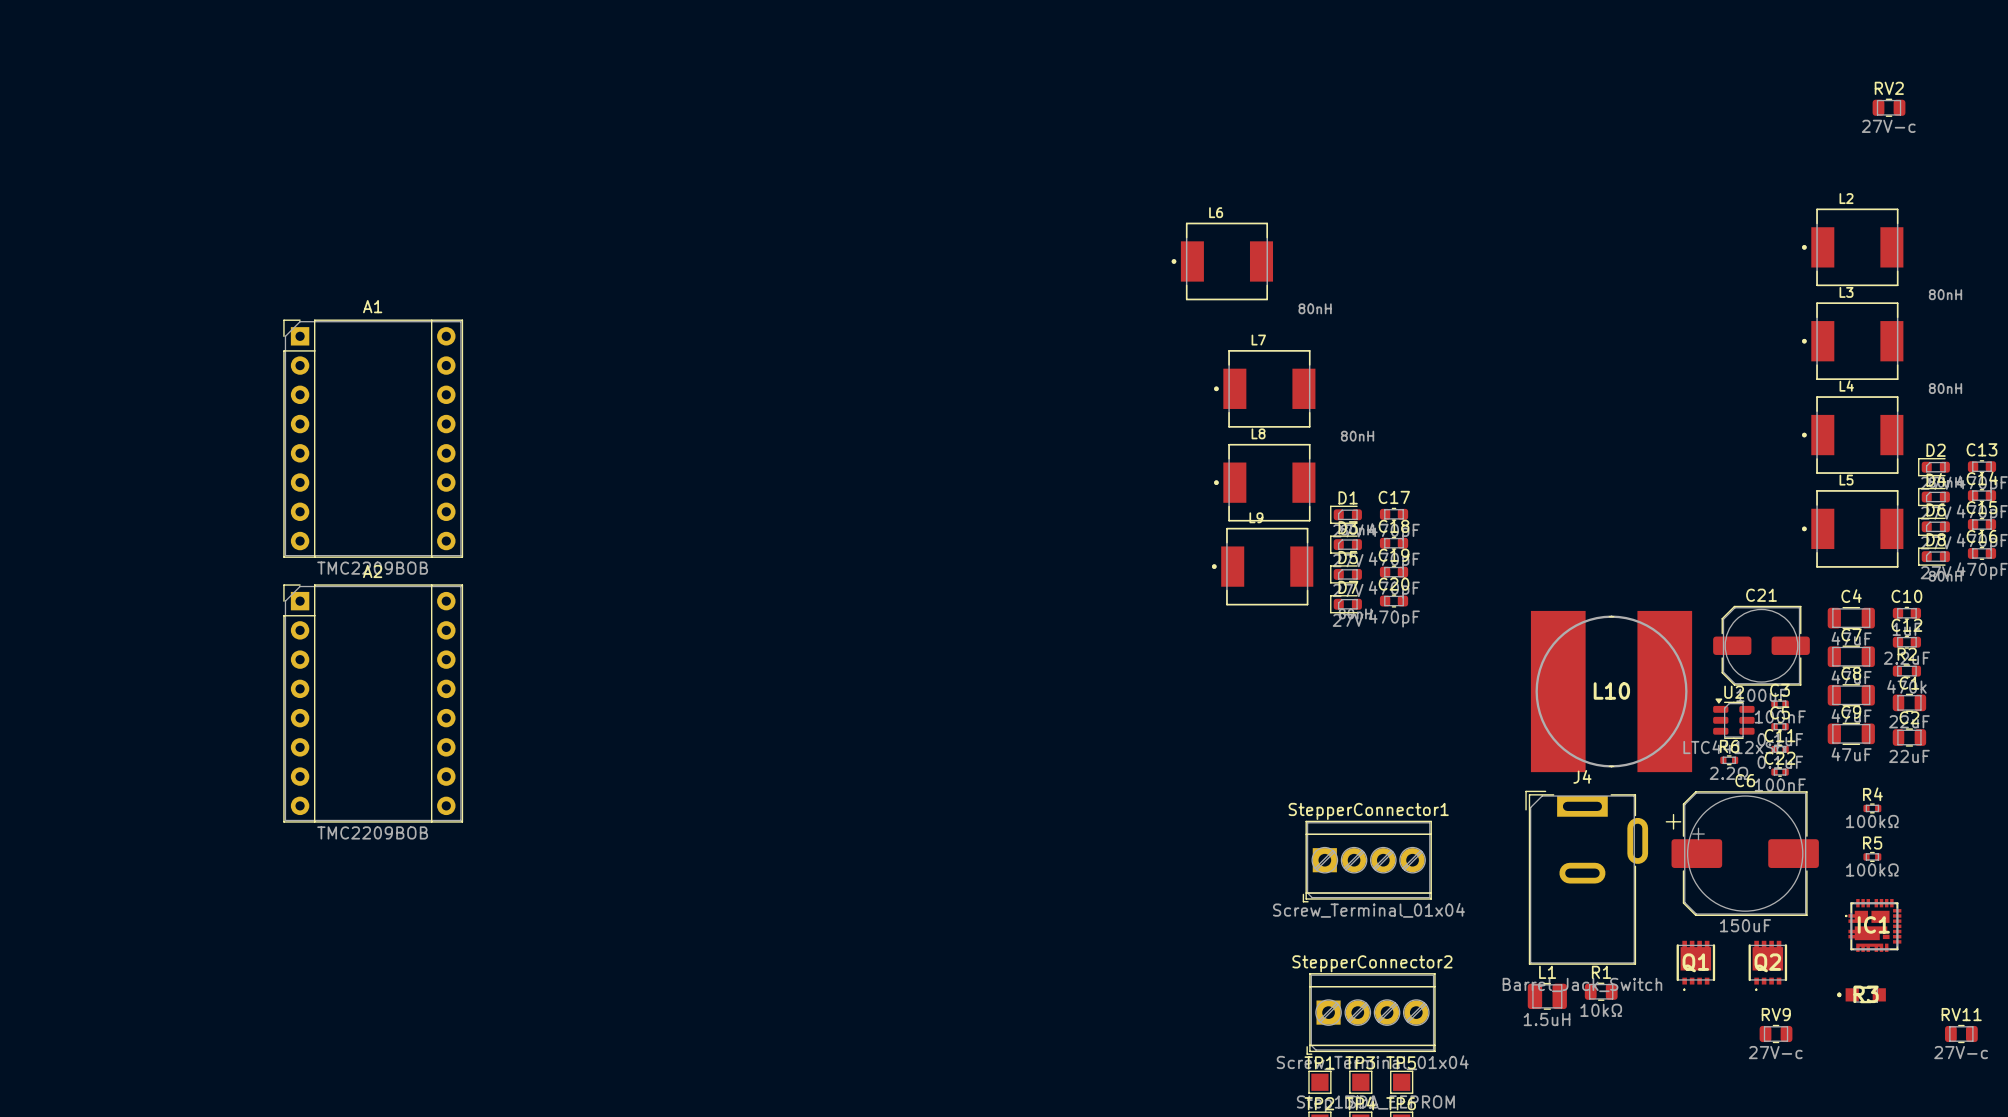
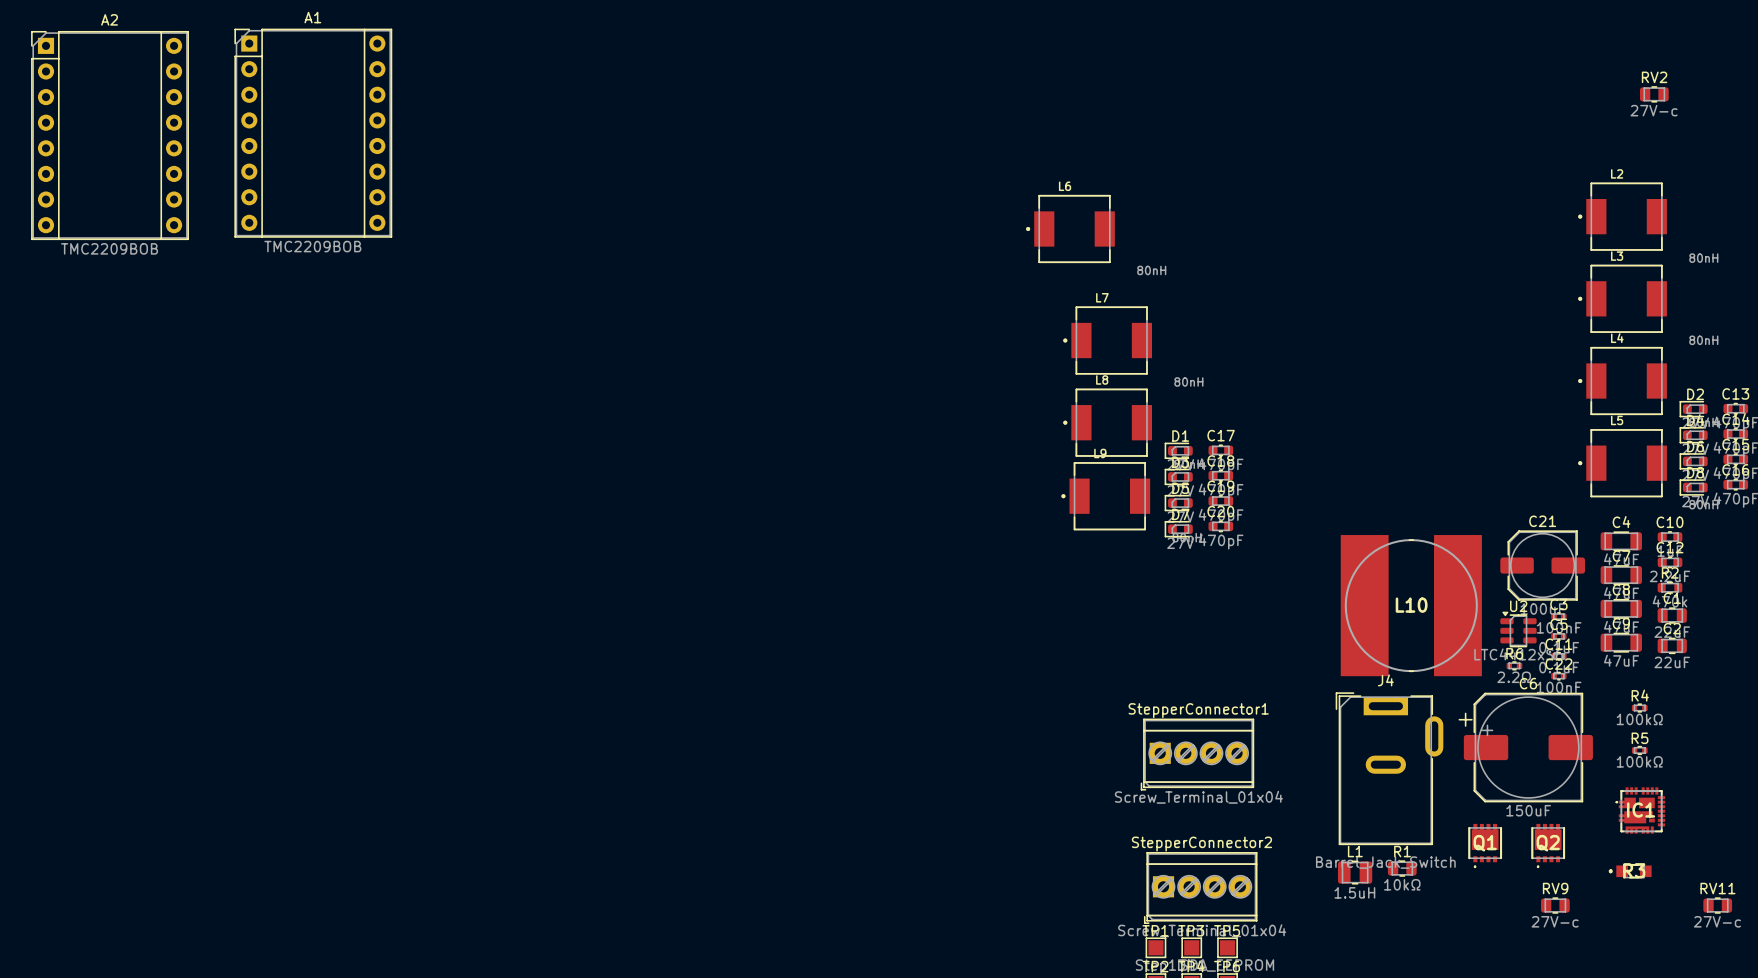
A1 position: (373, 438) -> (313, 133)
A2 position: (373, 703) -> (110, 135)

